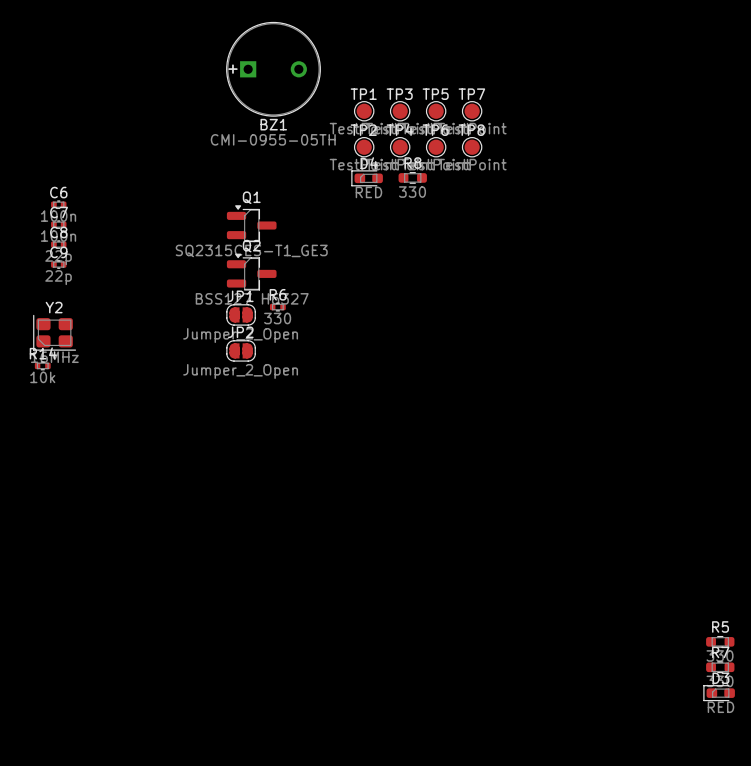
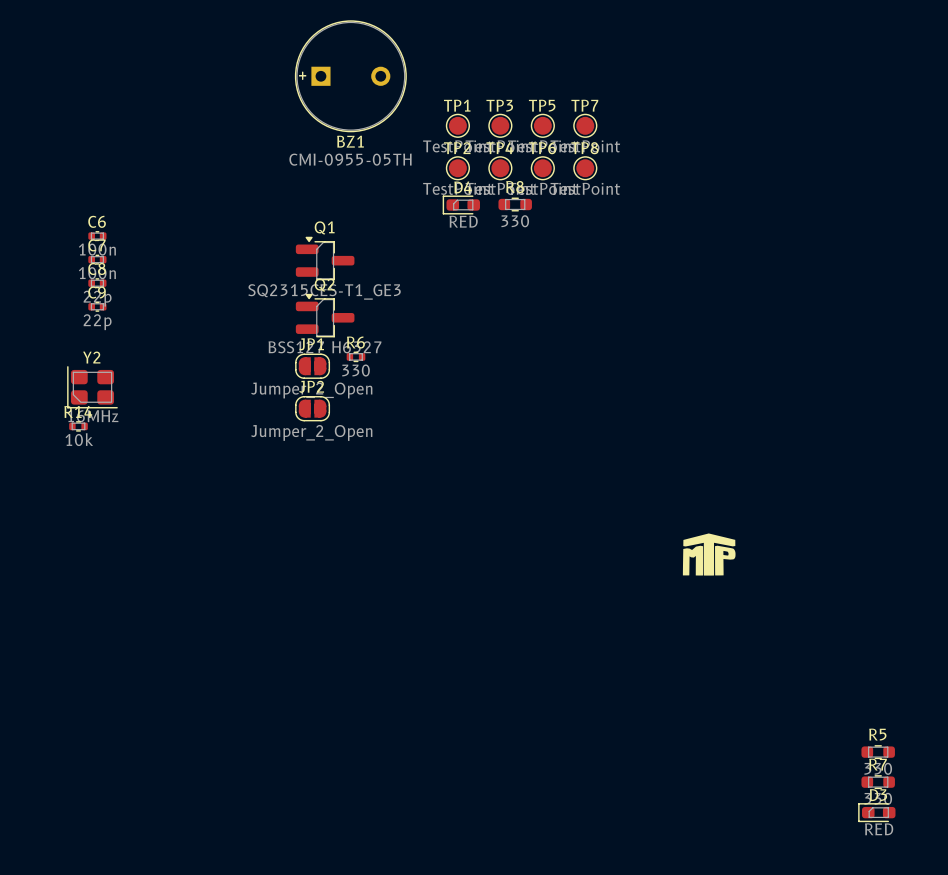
drawing: none -> [682, 533, 736, 576]

